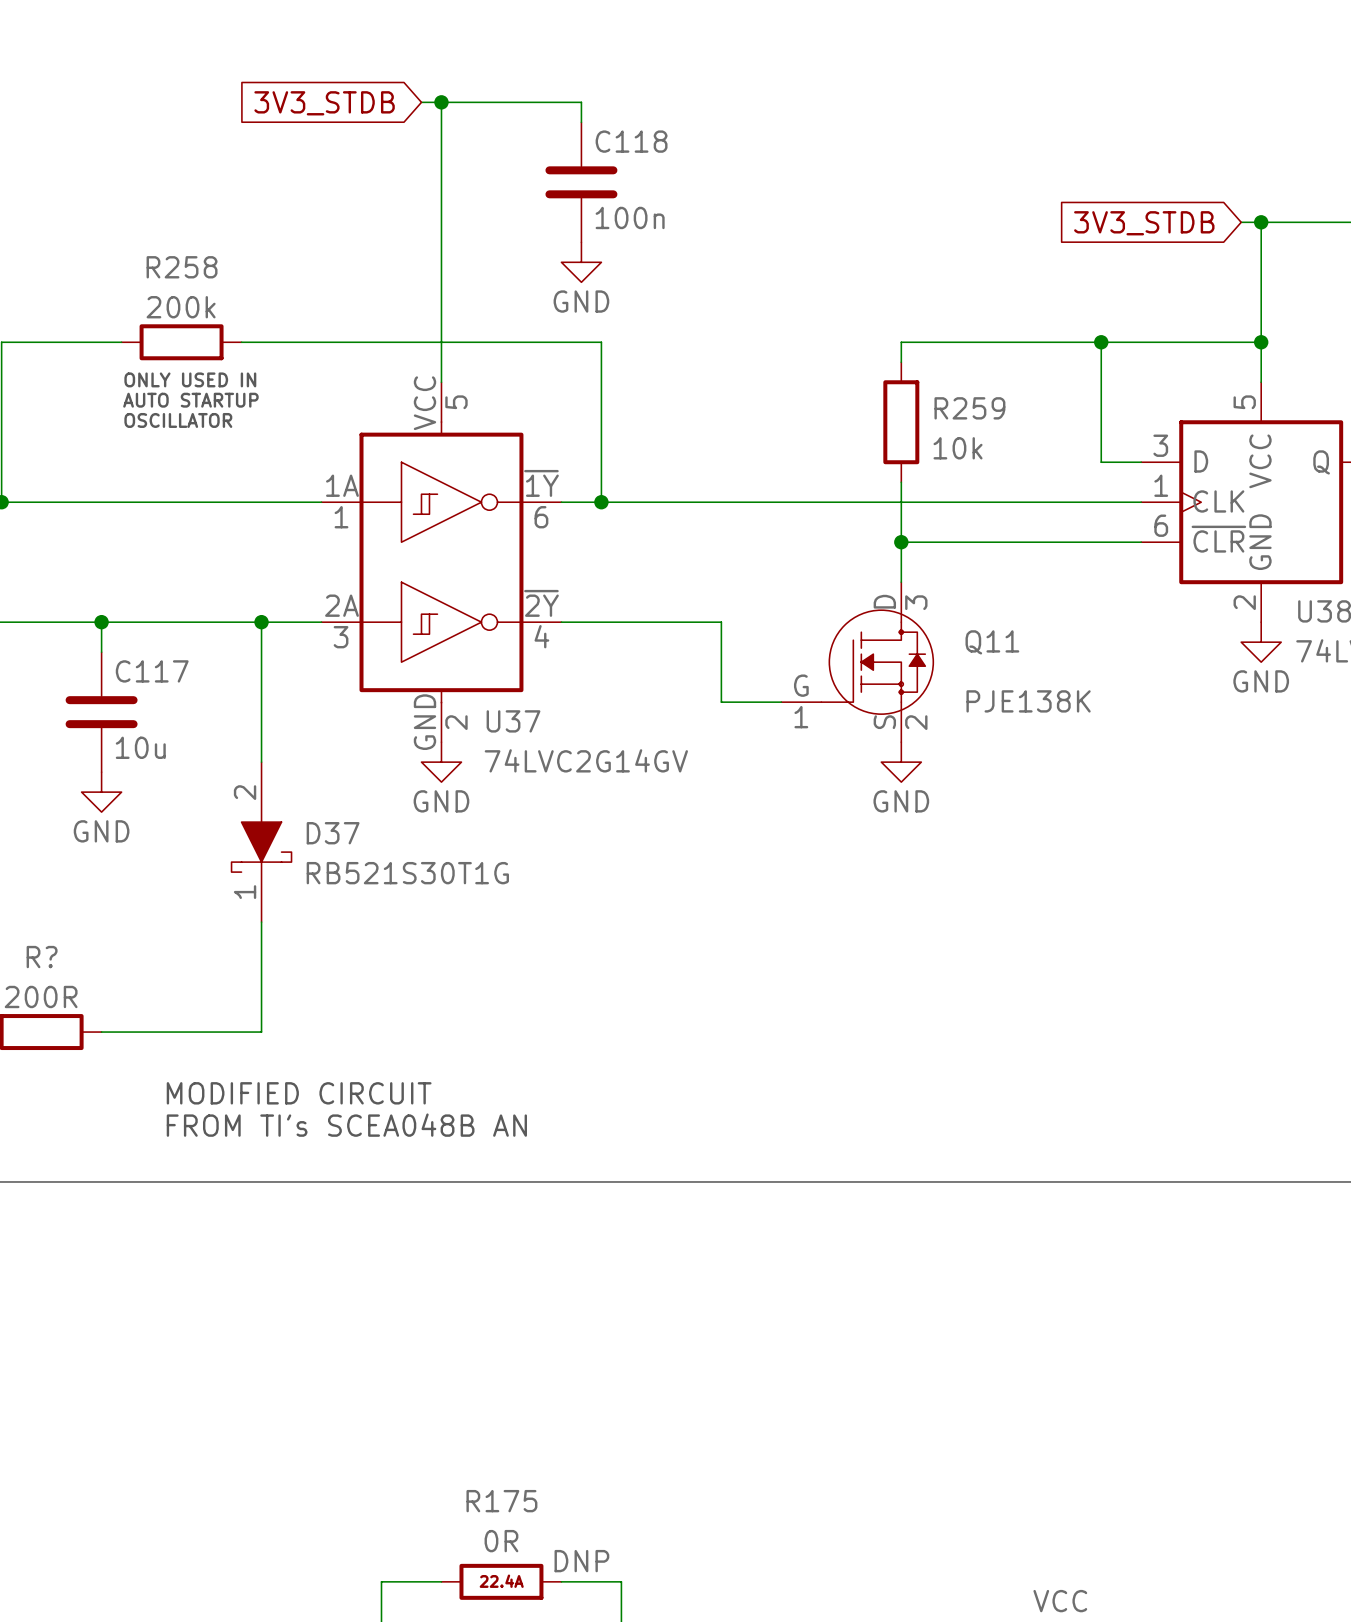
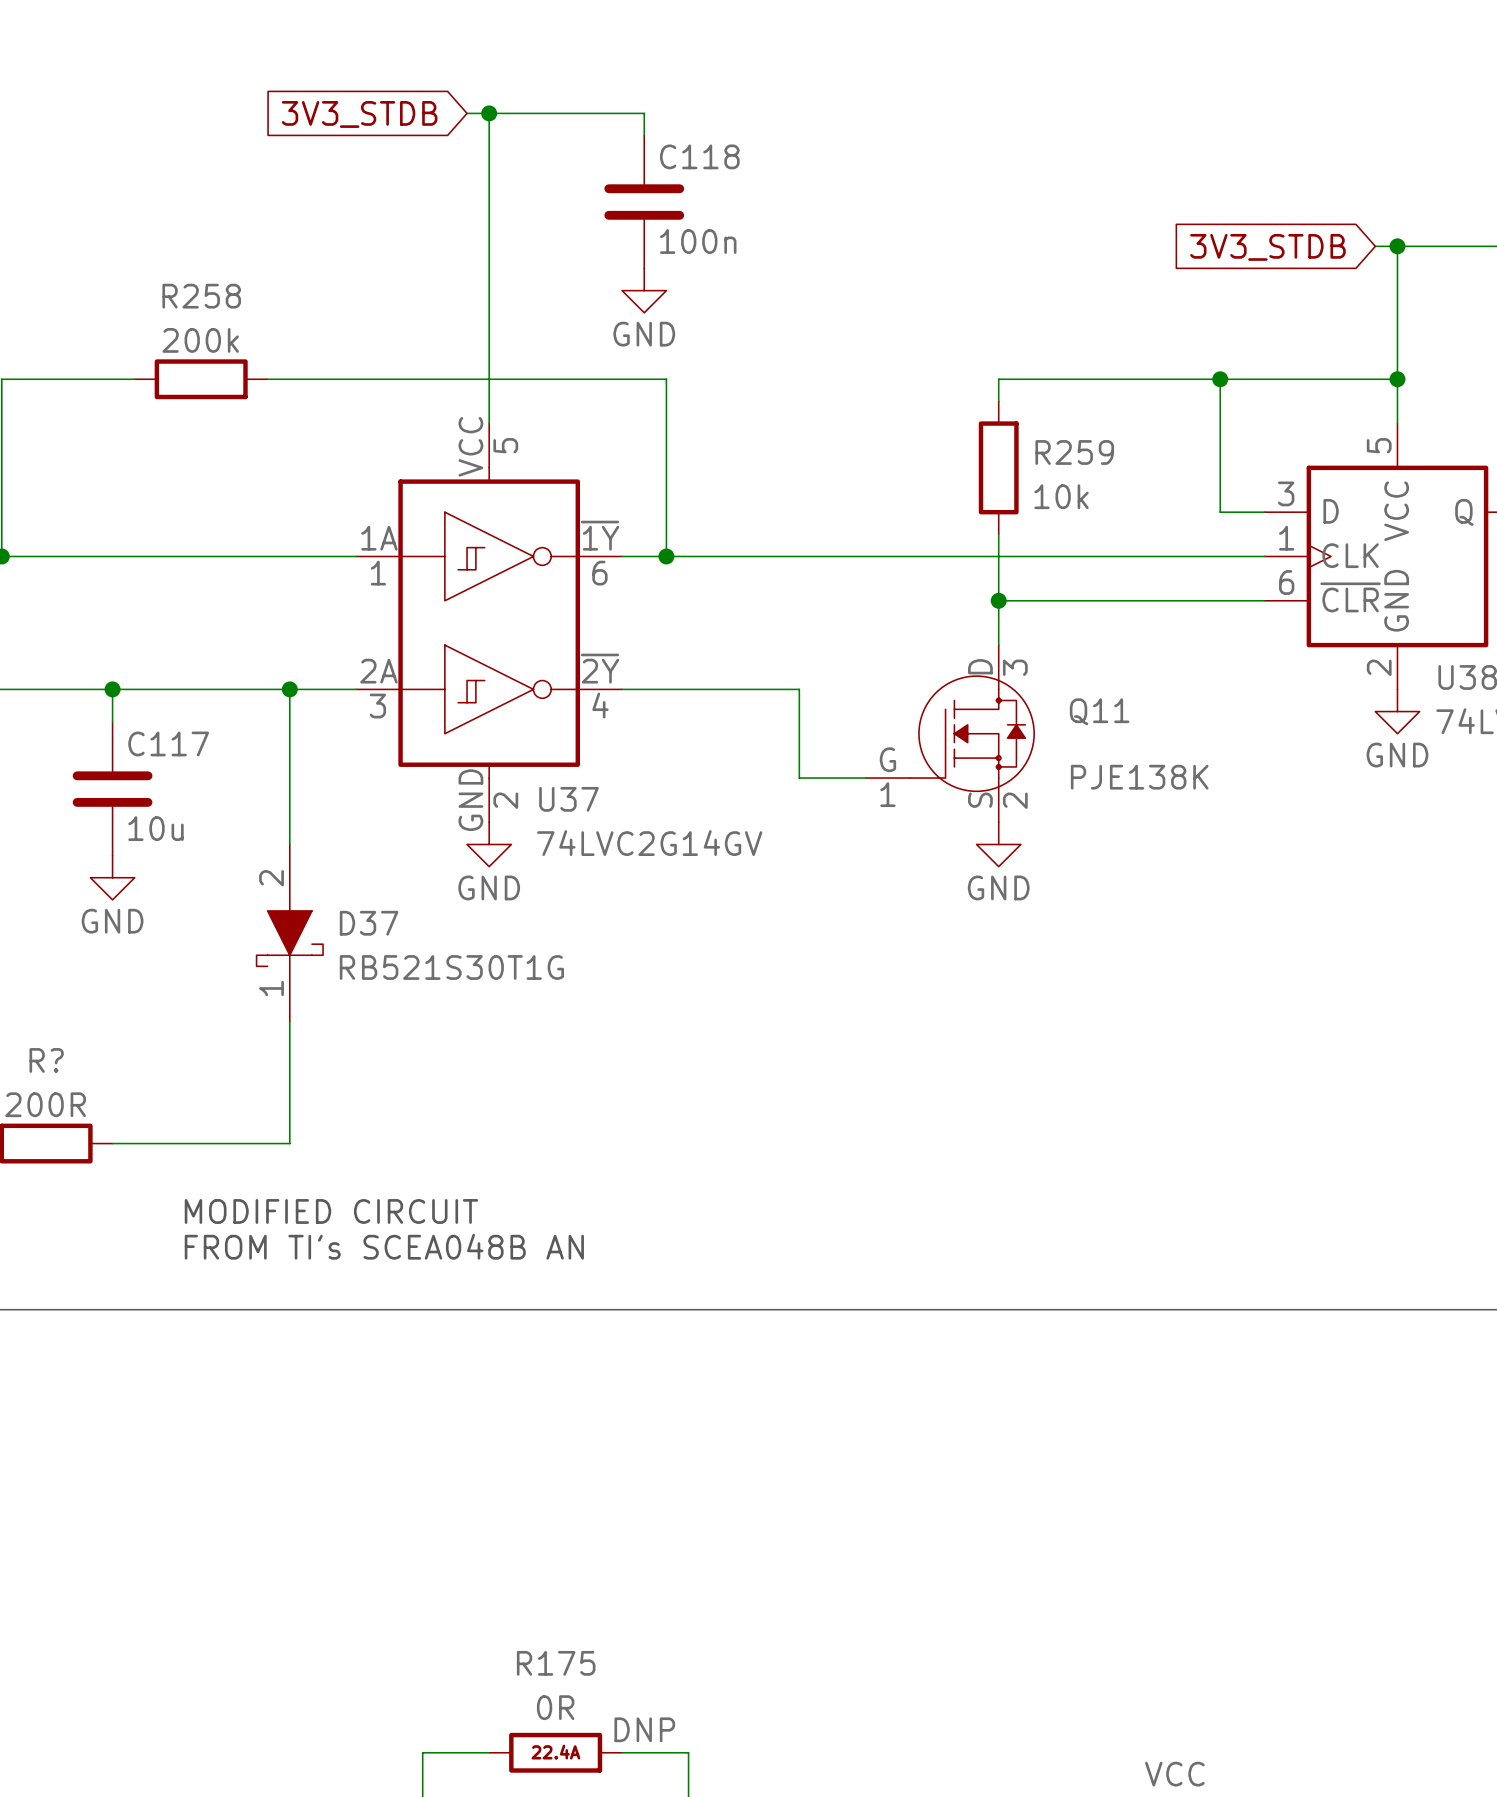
text: ONLY USED IN (190, 379) -> none
text: AUTO STARTUP (190, 400) -> none
text: OSCILLATOR (178, 420) -> none

